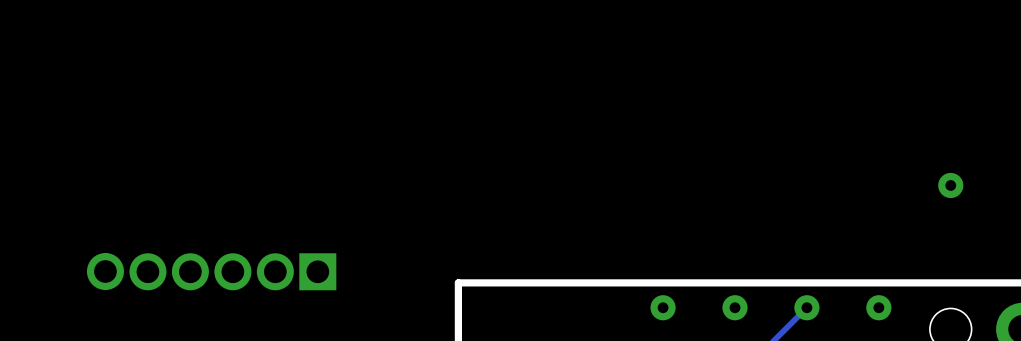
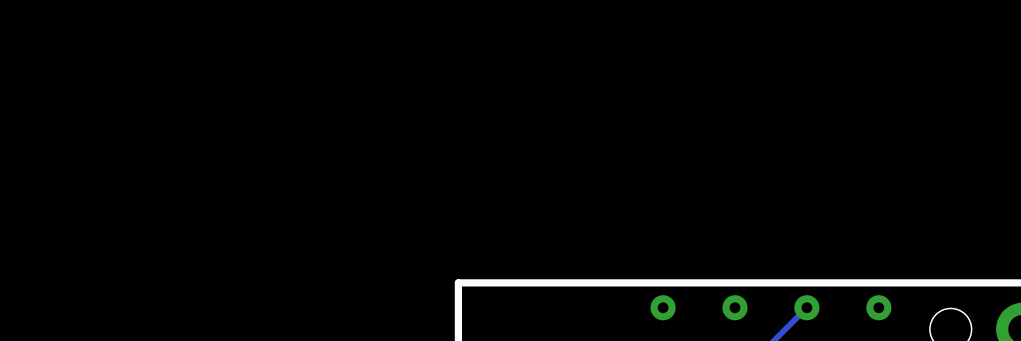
part: (950, 185) -> none
part: (211, 271) -> none

